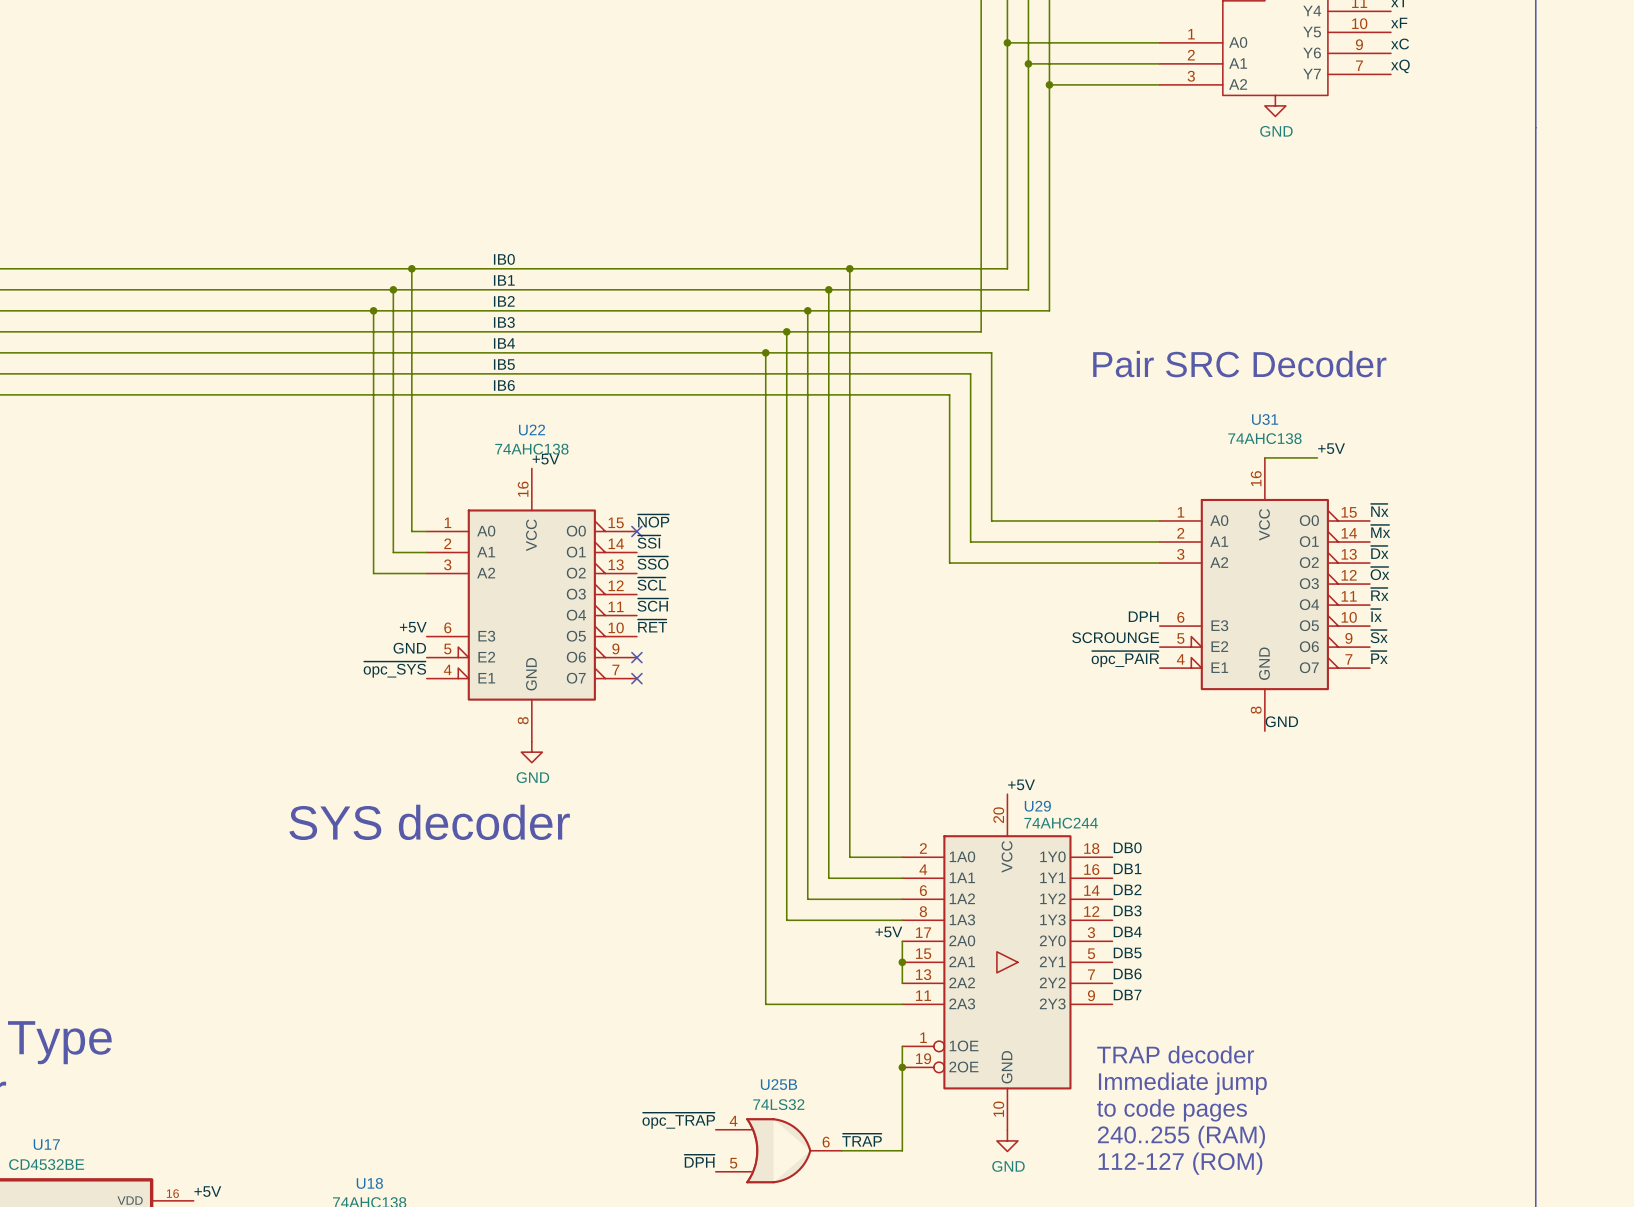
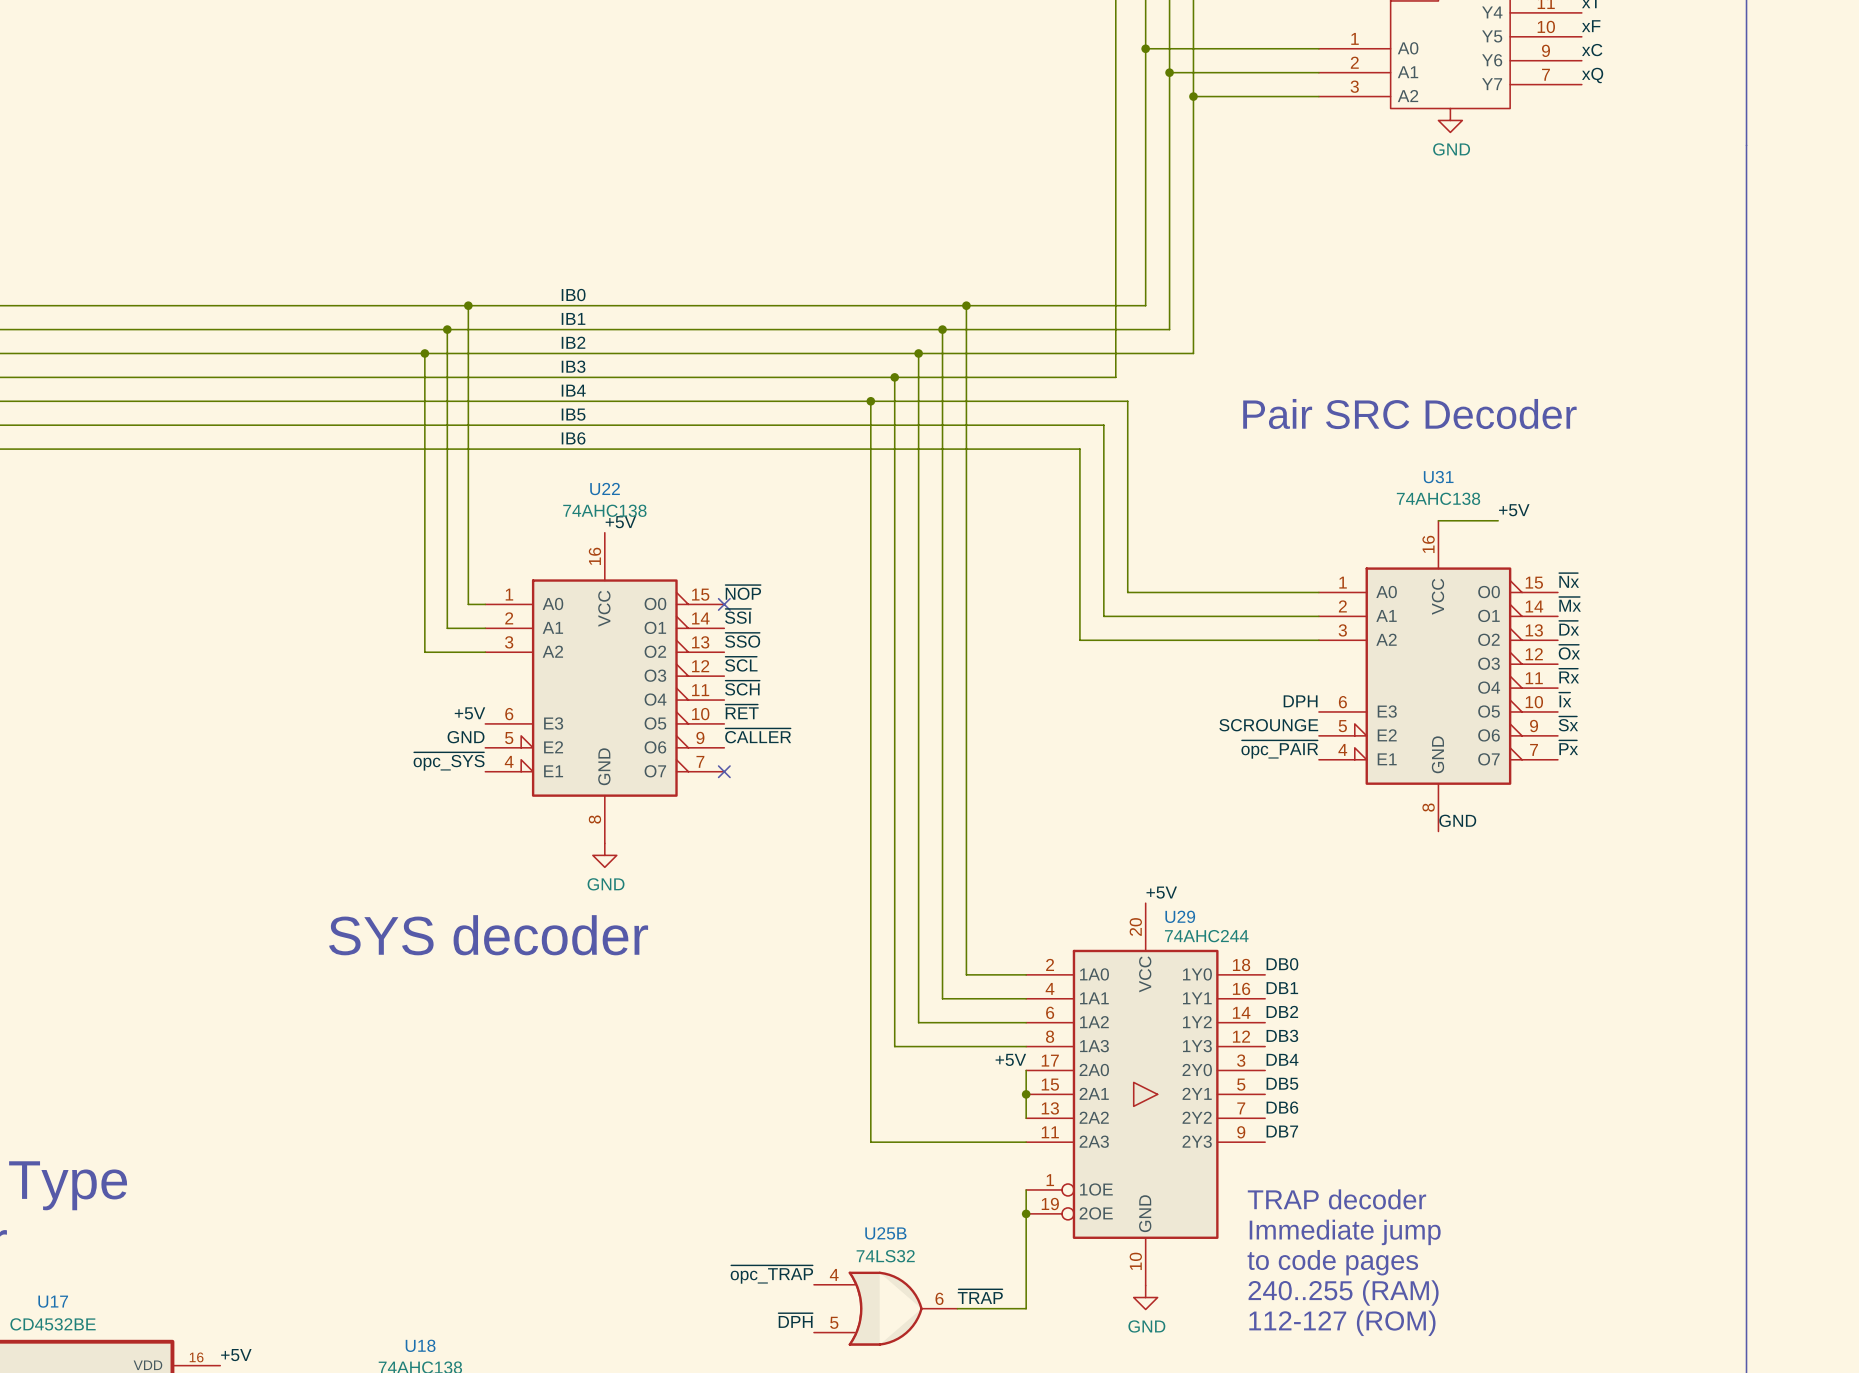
label: none -> ~{CALLER} (758, 735)
no-connect mark: (636, 657) -> none

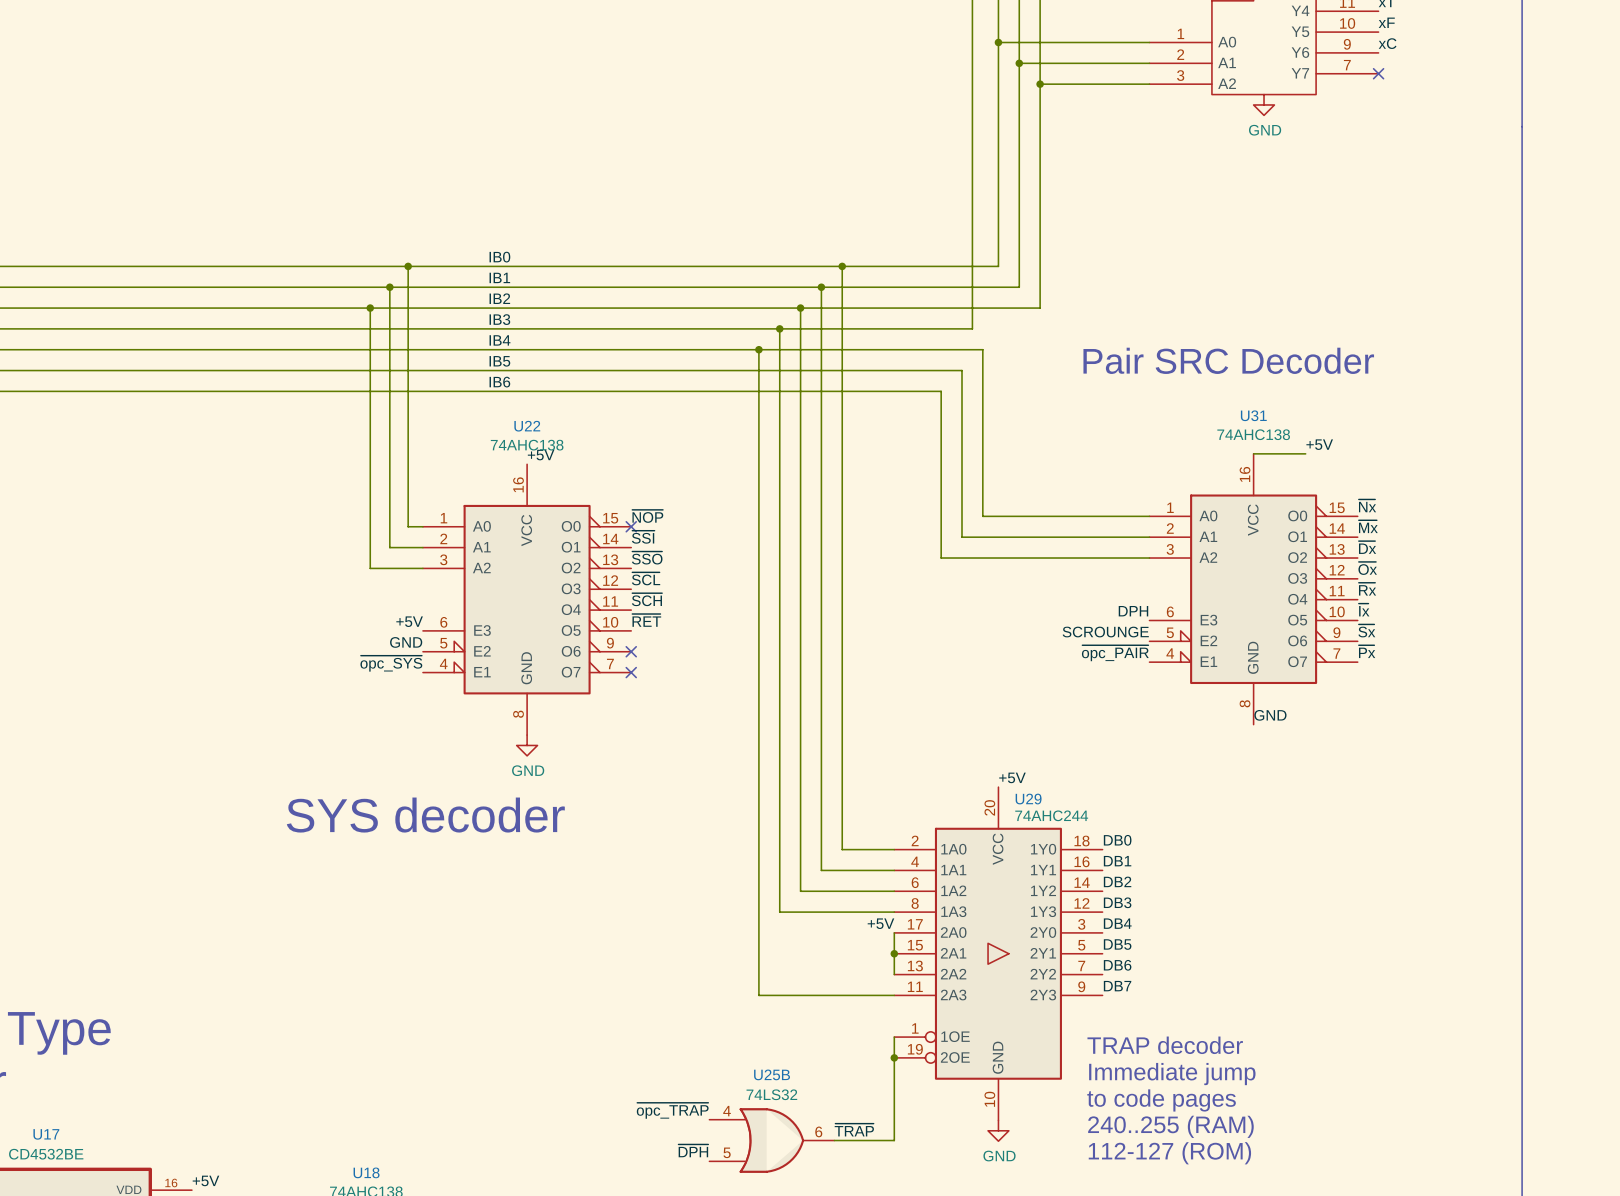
label: xQ (1592, 75) -> none
no-connect mark: none -> (1378, 73)
label: ~{CALLER} (758, 735) -> none
no-connect mark: none -> (631, 651)

